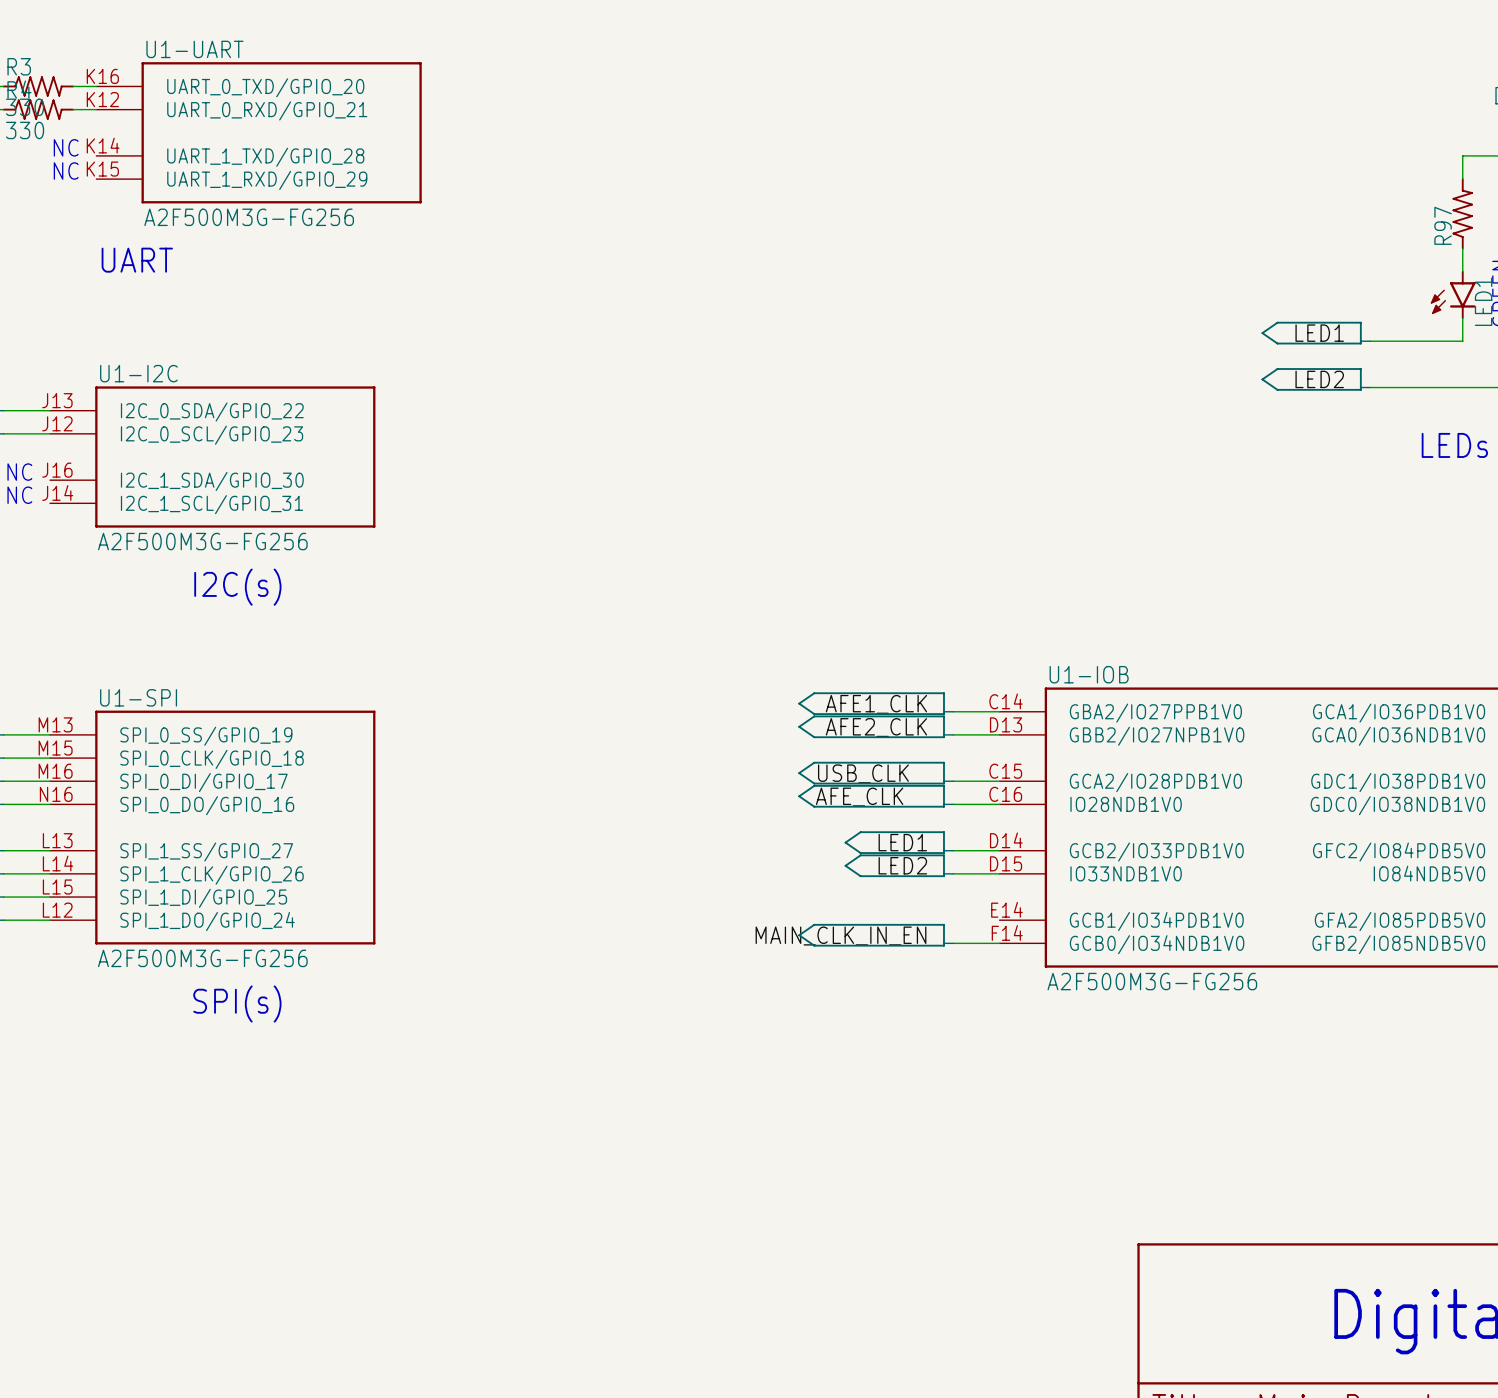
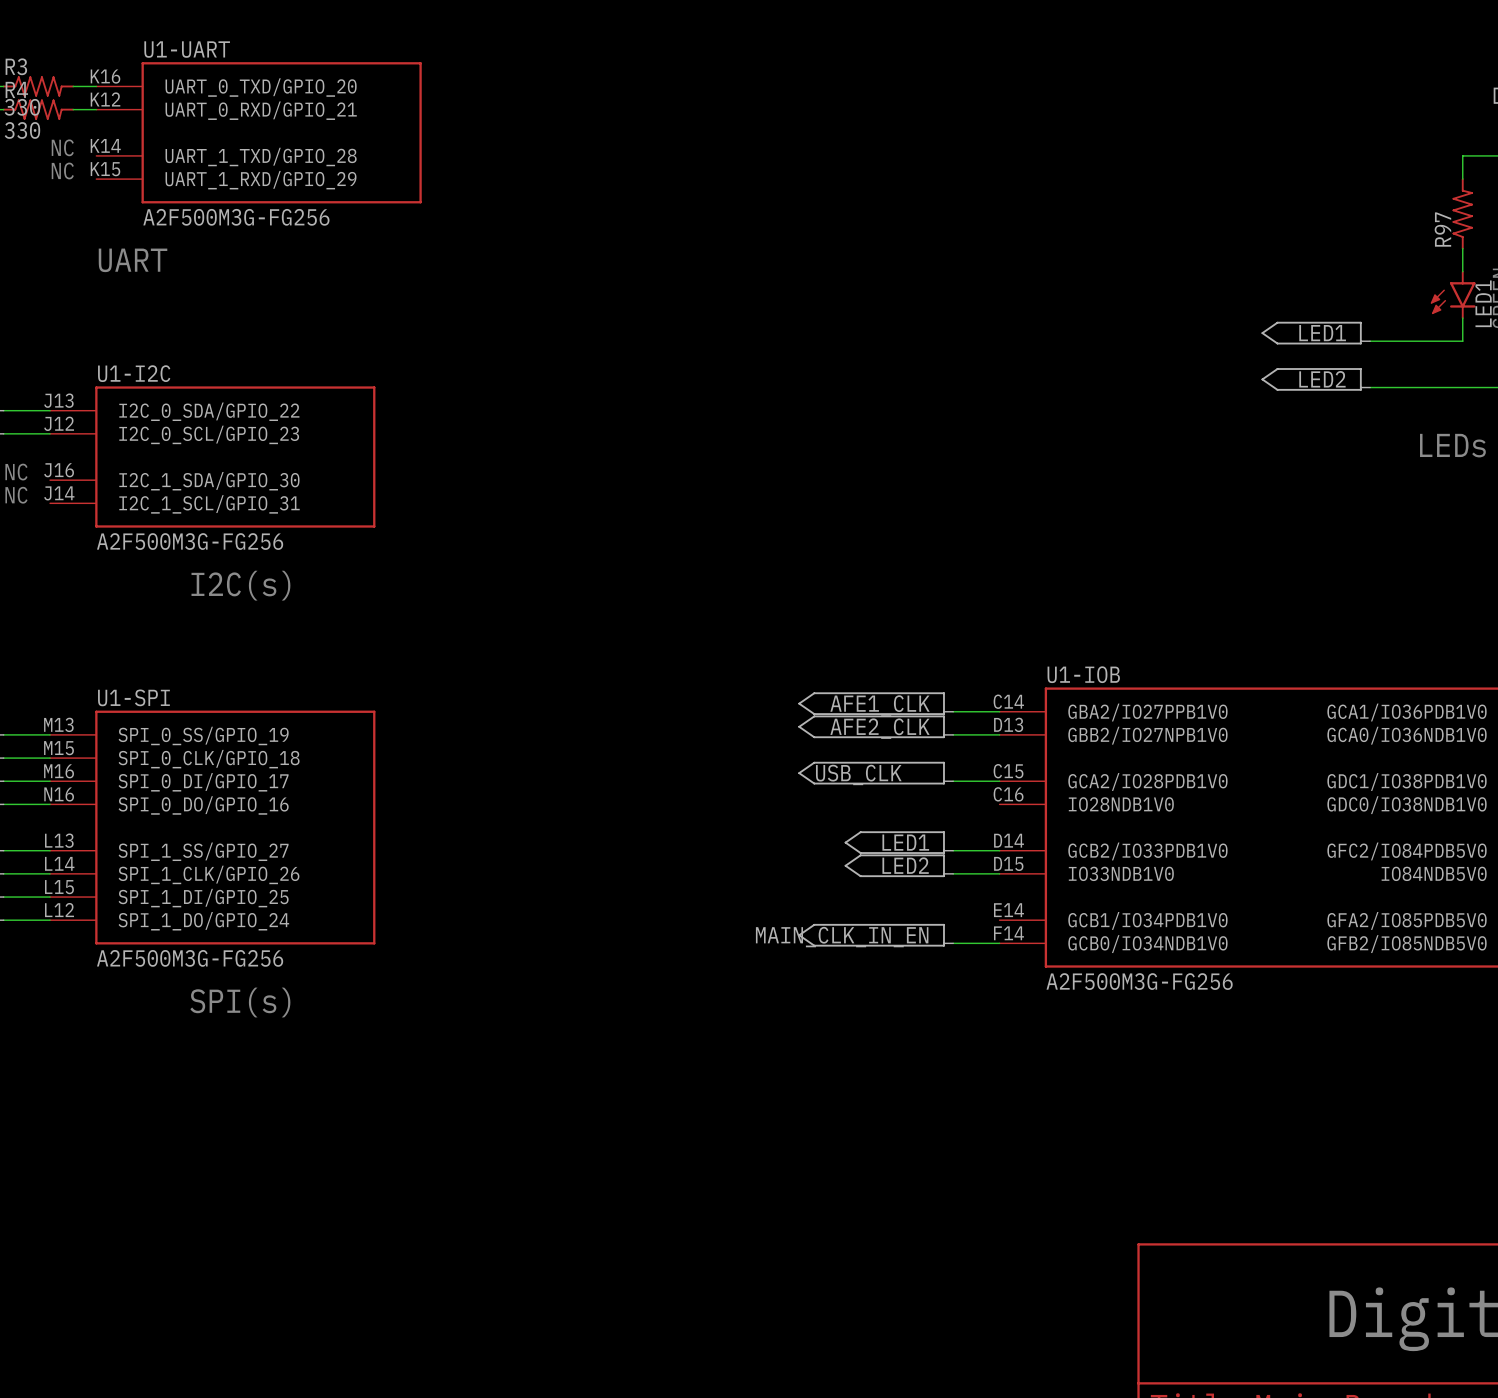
part: (876, 796) -> none
label: AFE_CLK (859, 797) -> none
wire: (953, 804) (999, 804) -> none

